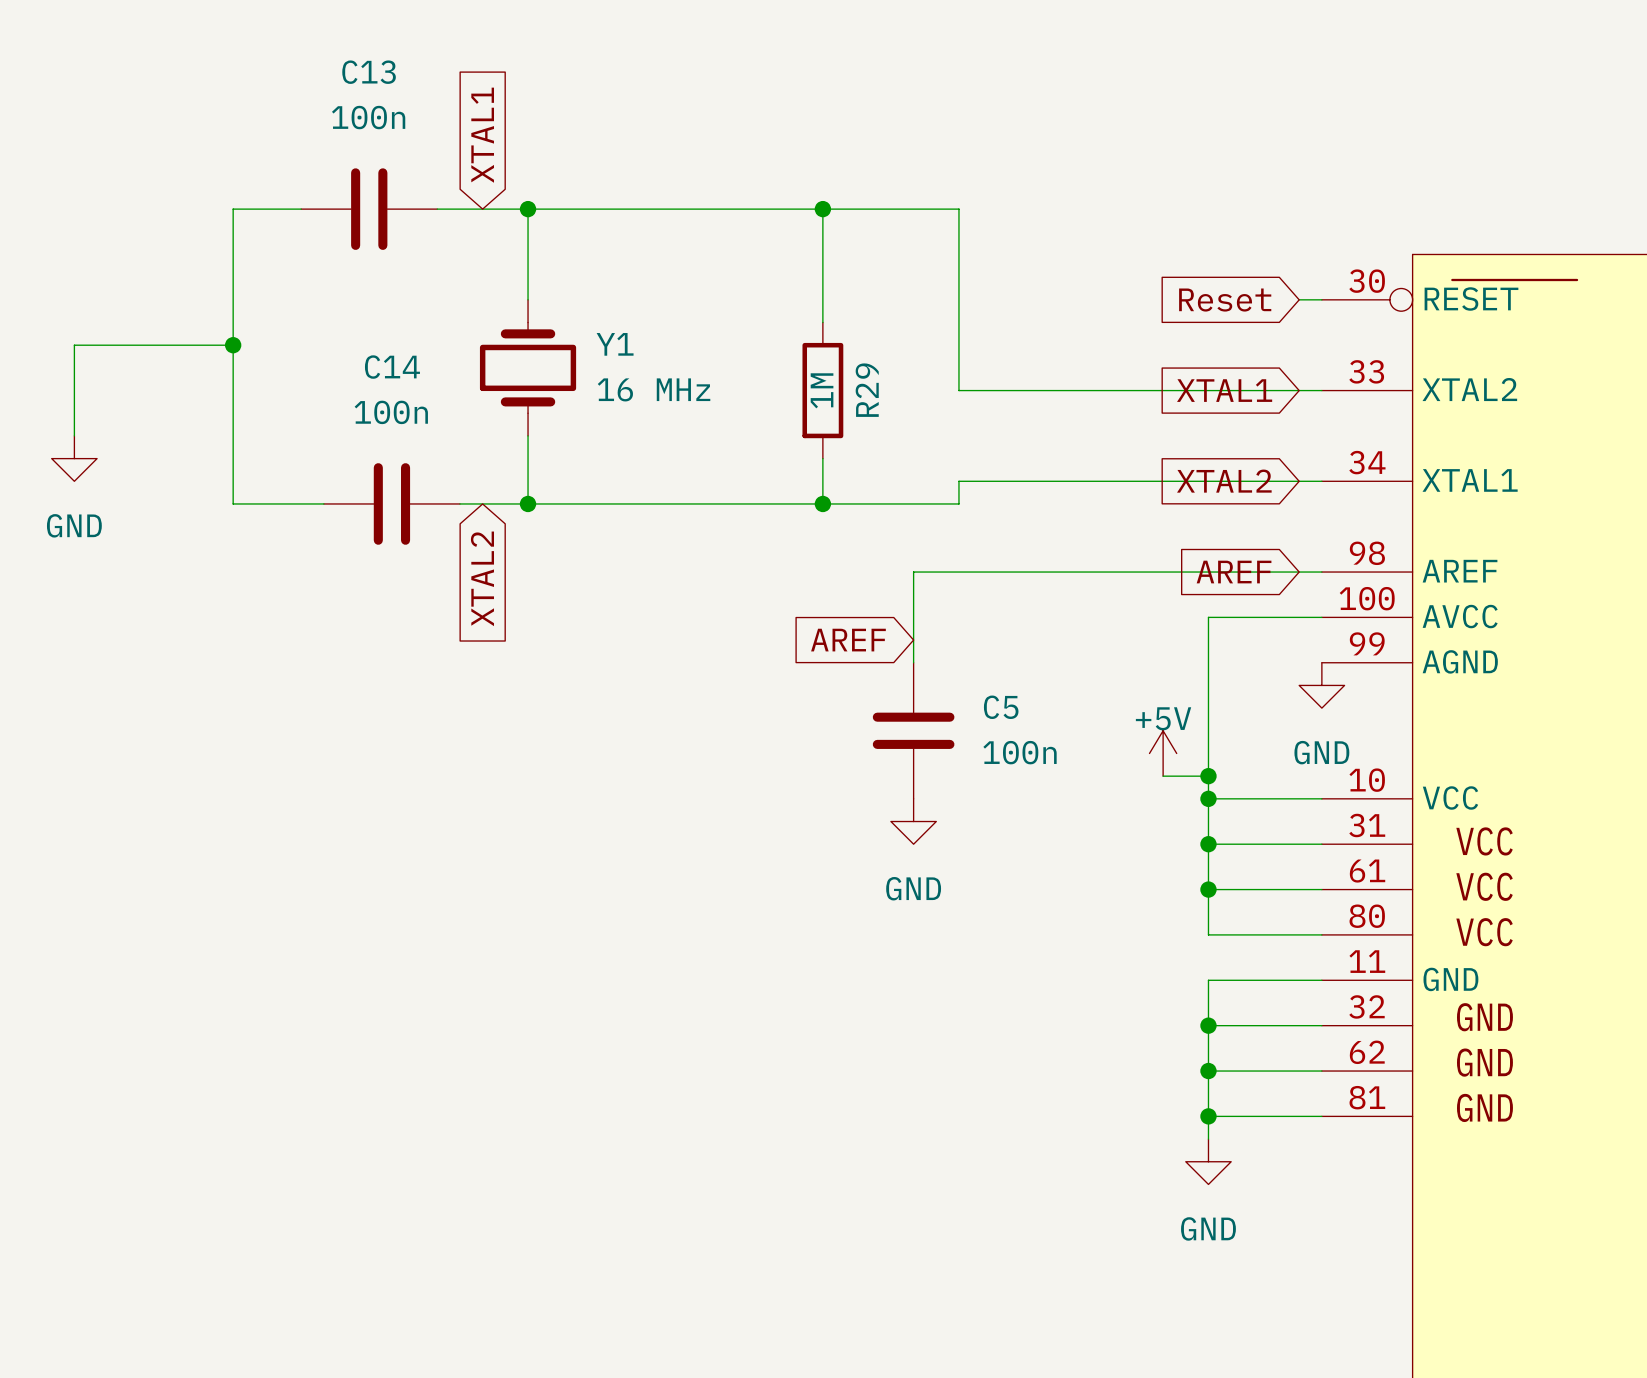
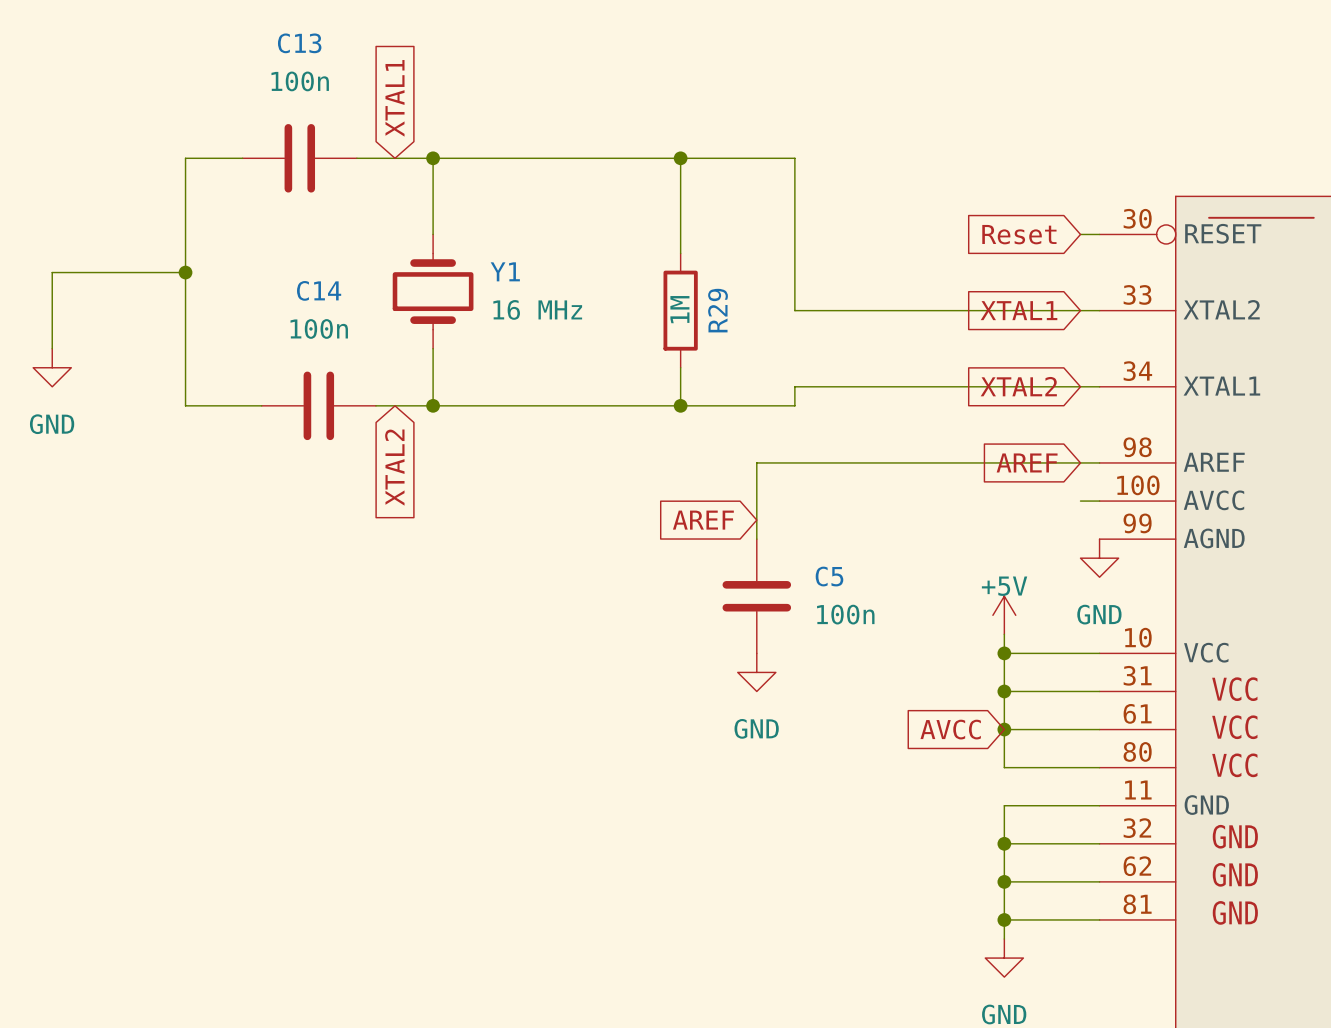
wire: (1299, 617) (1208, 617) (1208, 776) (1163, 776) -> none
power symbol position: +5V (1163, 753) -> +5V (1004, 615)
junction: (1208, 776) -> none
global label: none -> AVCC (950, 729)

